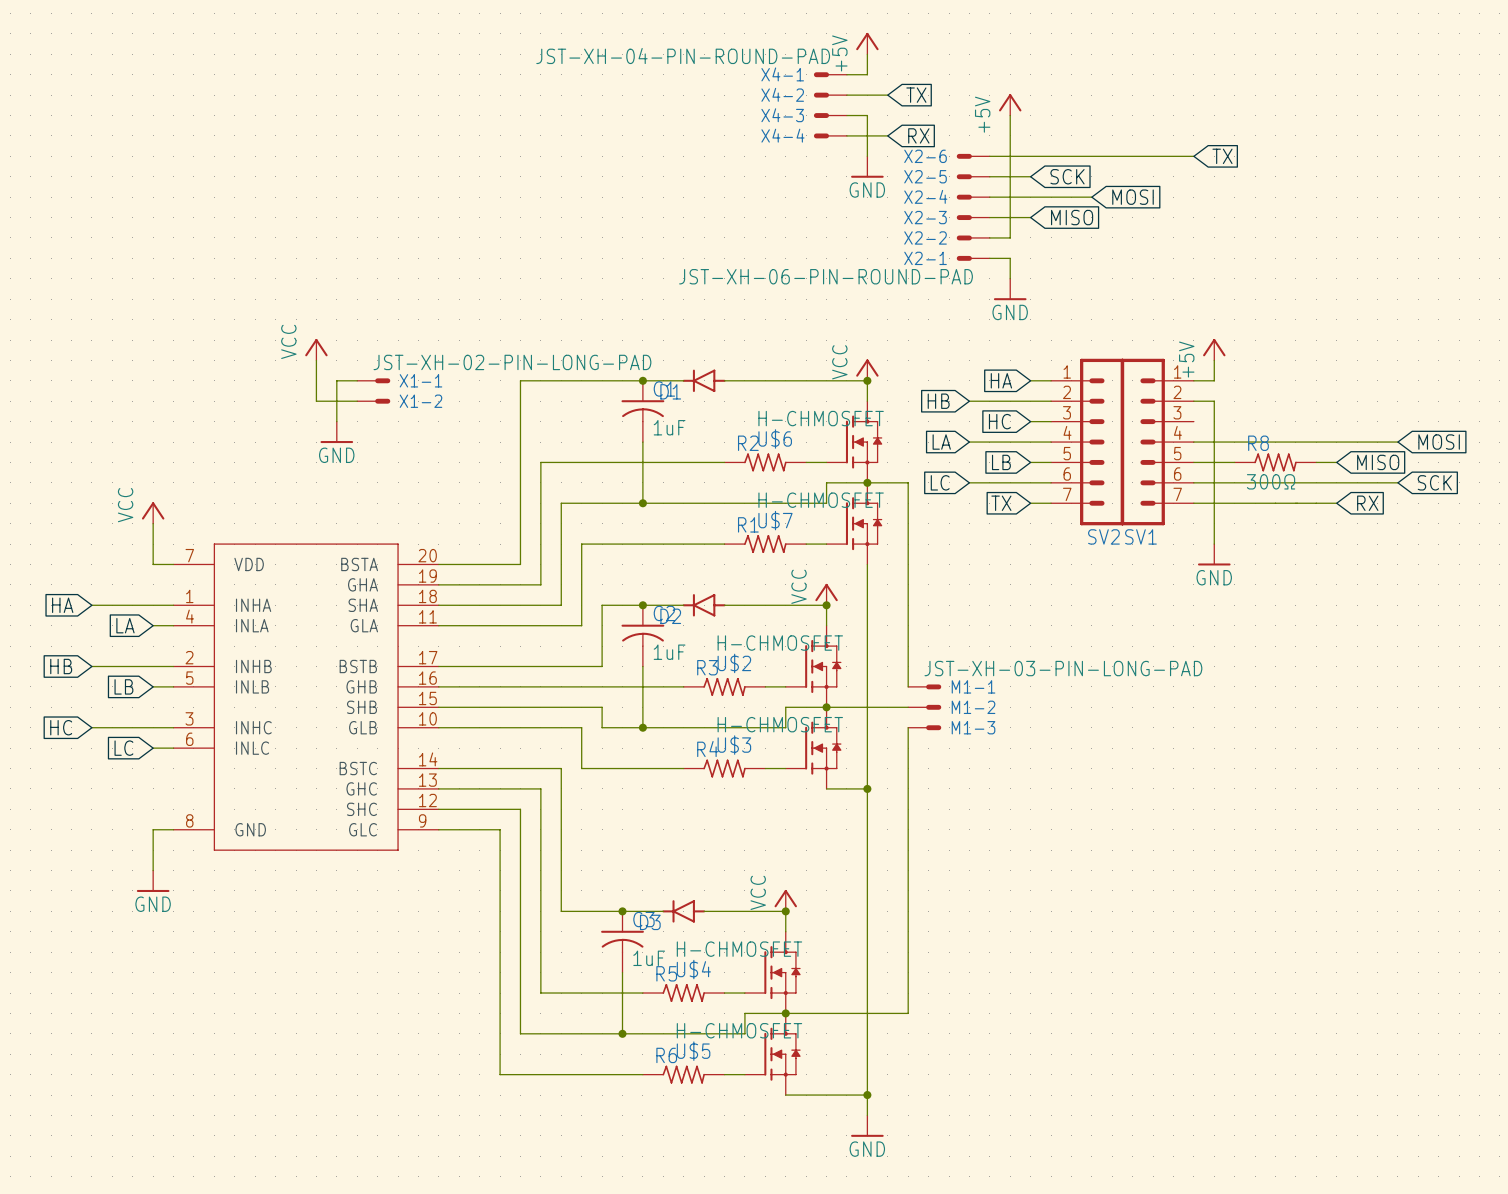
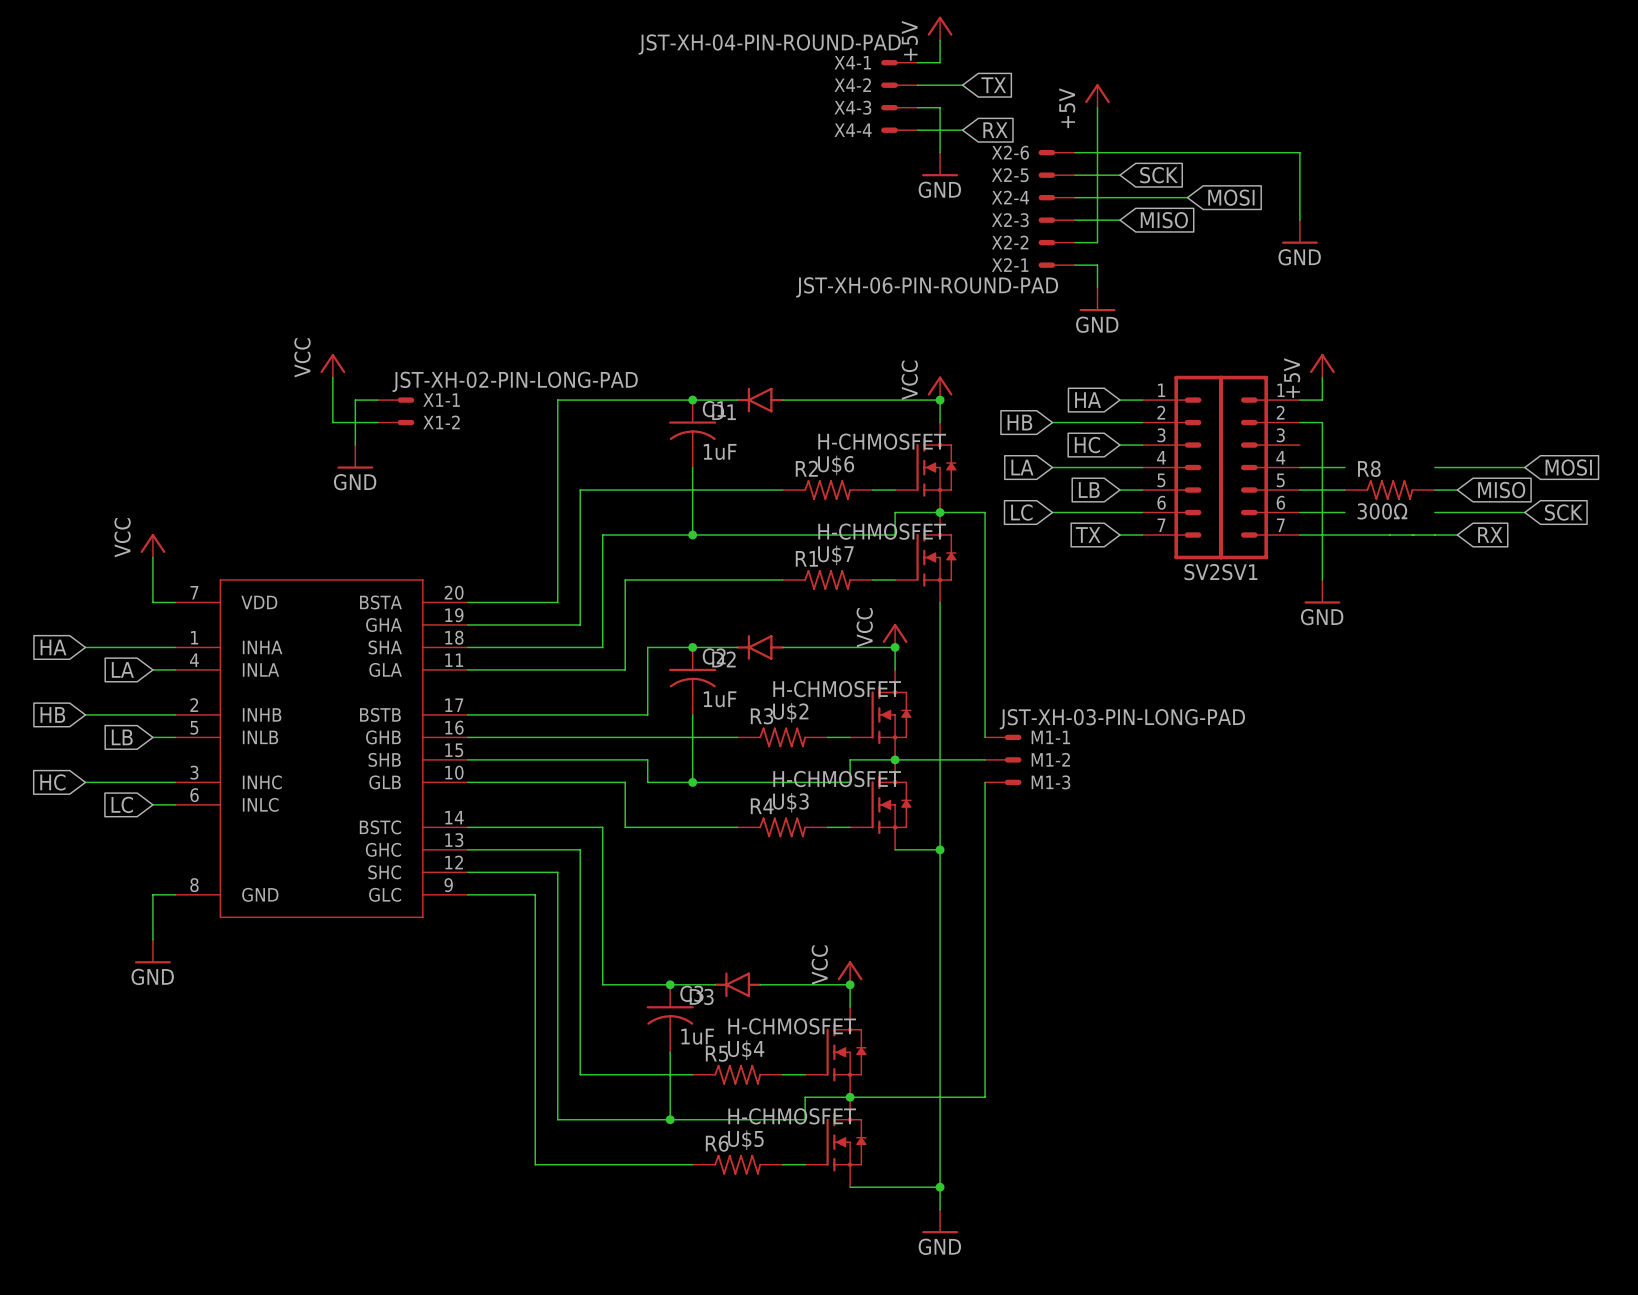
wire: none -> (1299, 152) (1299, 220)
global label: TX (1222, 156) -> none
power symbol: none -> GND (1299, 231)
wire: (1234, 442) (1316, 442) -> none
wire: (1234, 482) (1316, 482) -> none

